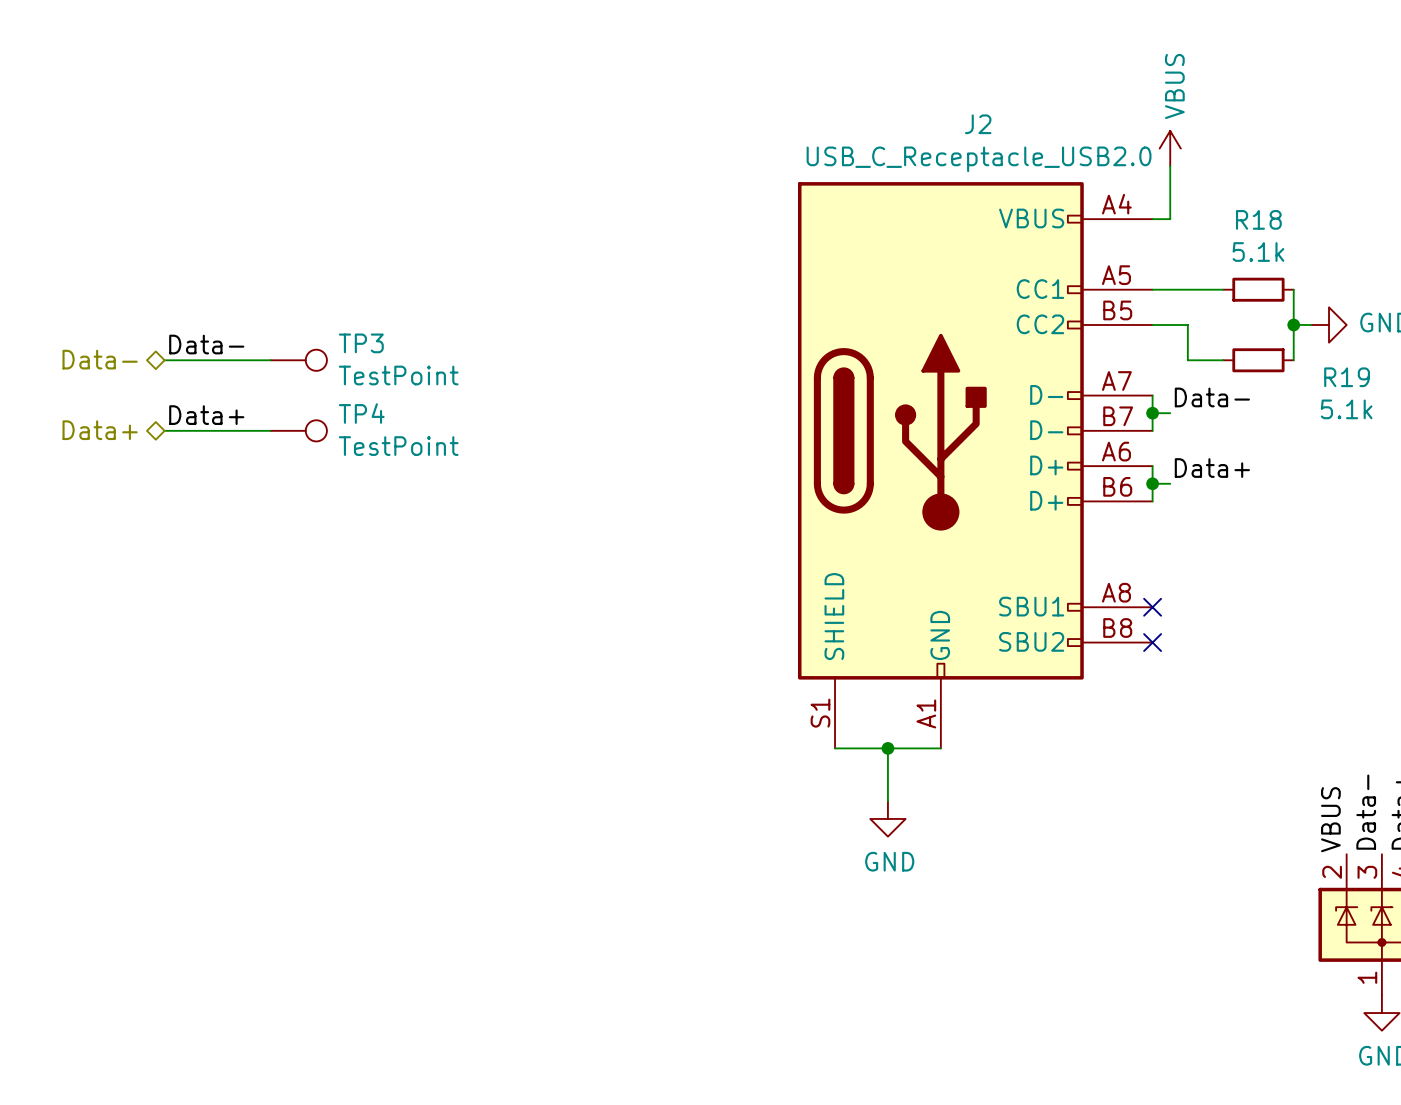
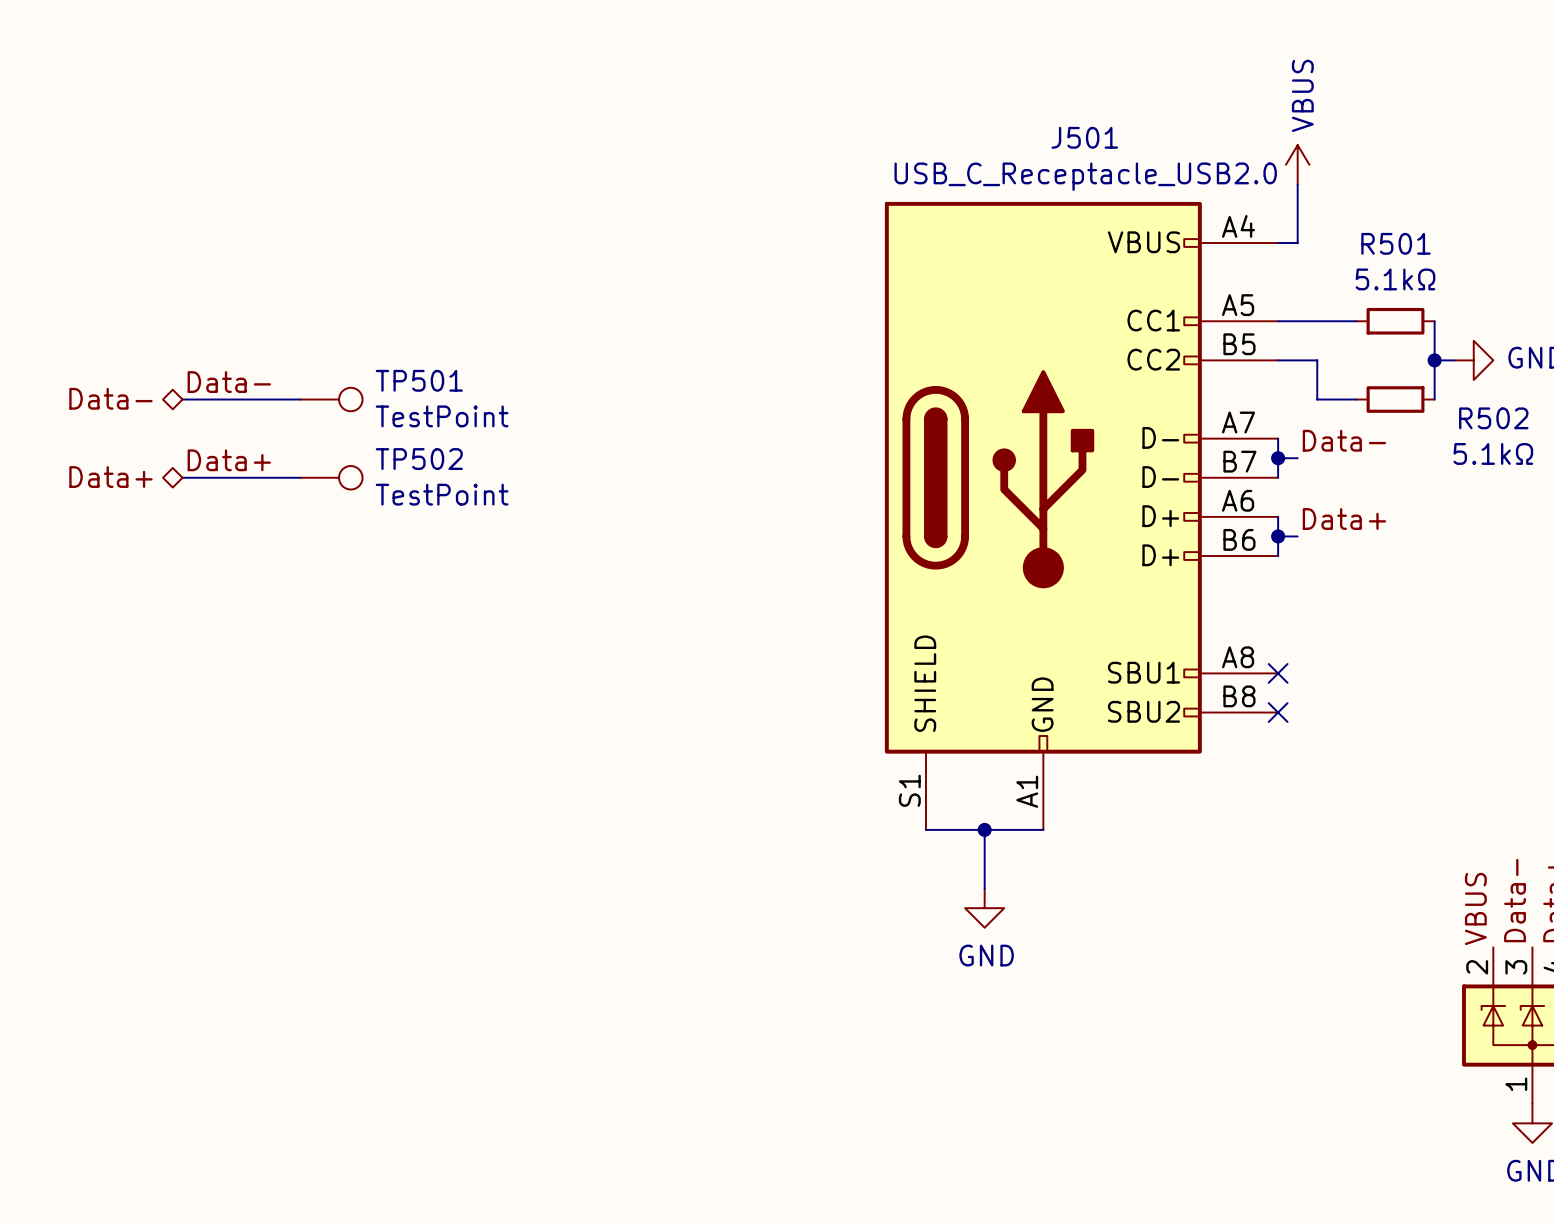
J2 name: J2 (978, 124) -> J501 (1084, 137)
R18 name: R18 (1258, 219) -> R501 (1395, 243)
R18 value: 5.1k (1258, 252) -> 5.1kΩ (1395, 279)
TP3 name: TP3 (361, 343) -> TP501 (419, 380)
R19 name: R19 (1347, 377) -> R502 (1493, 418)
R19 value: 5.1k (1346, 409) -> 5.1kΩ (1493, 453)
TP4 name: TP4 (361, 413) -> TP502 (419, 459)

